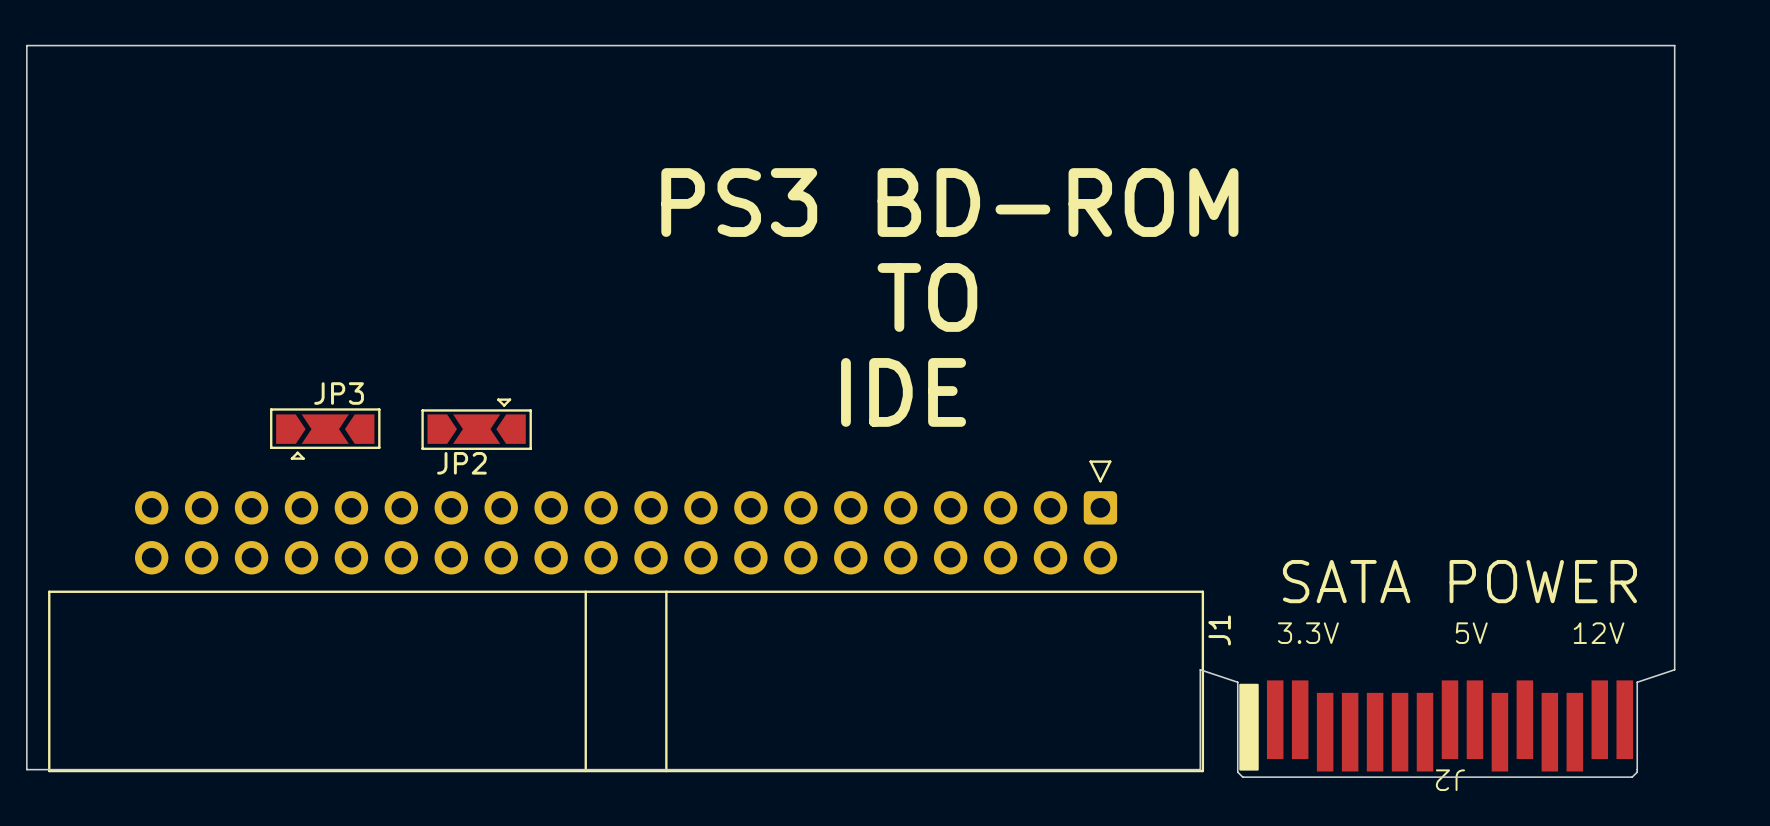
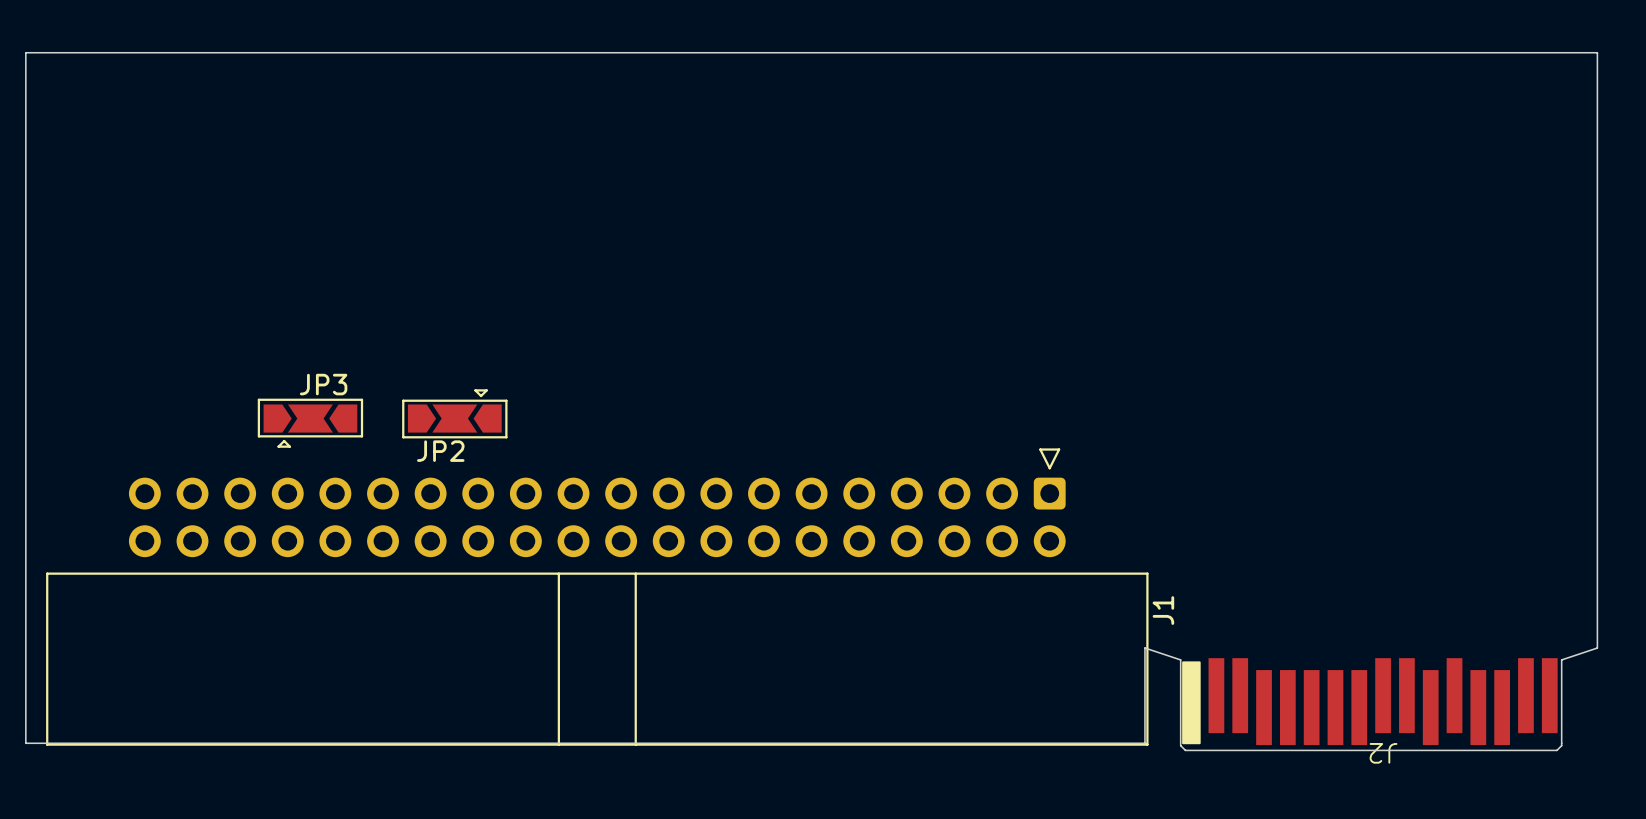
text: PS3 BD-ROM (949, 202) -> none
text: TO (927, 297) -> none
text: IDE (903, 392) -> none
text: SATA POWER (1459, 581) -> none
text: 3.3V (1308, 633) -> none
text: 5V (1471, 633) -> none
text: 12V (1599, 633) -> none

